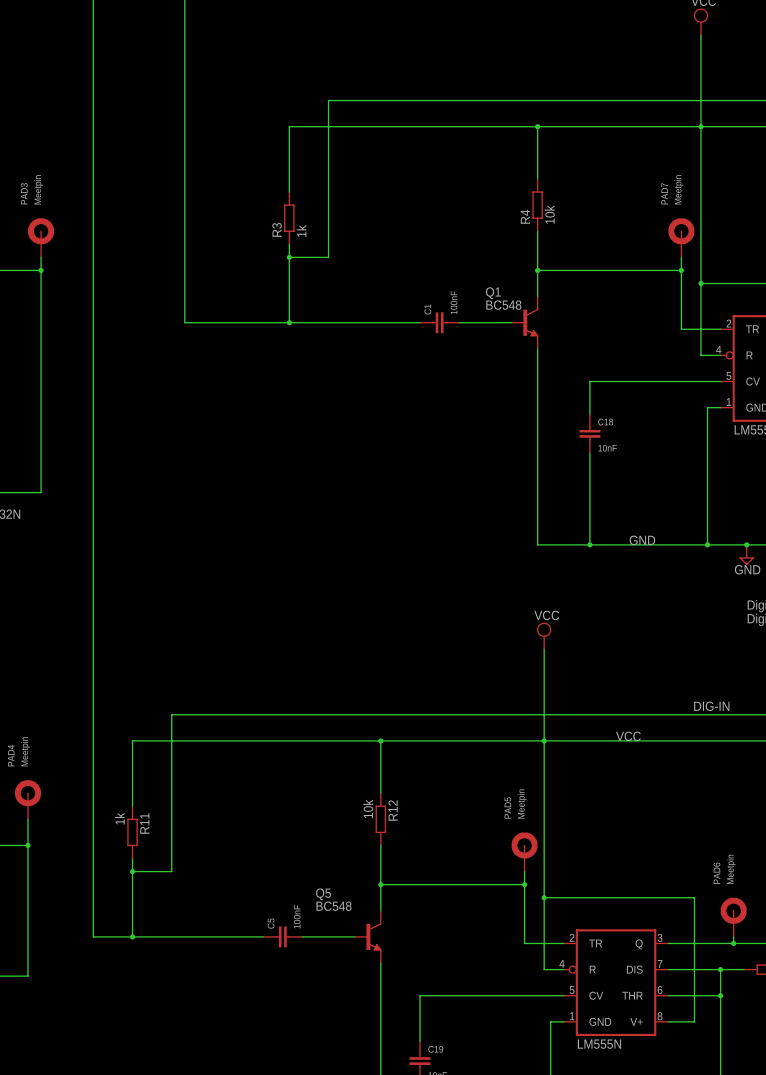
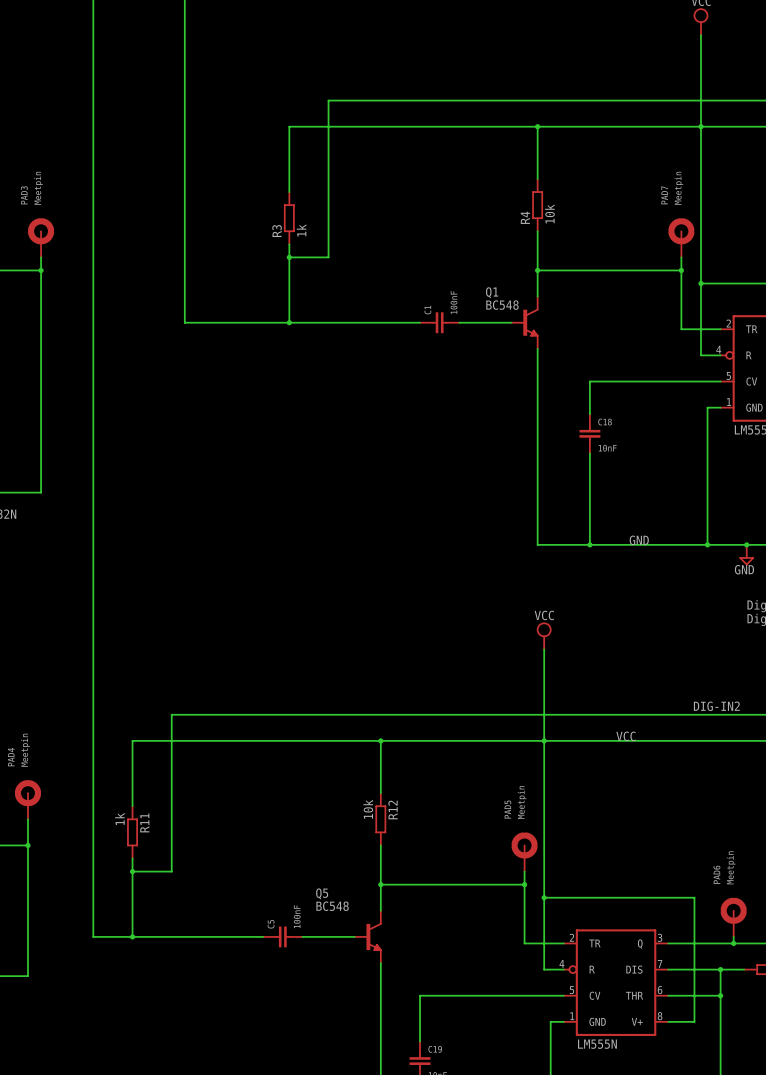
label: DIG-IN (711, 706) -> DIG-IN2 (716, 706)

